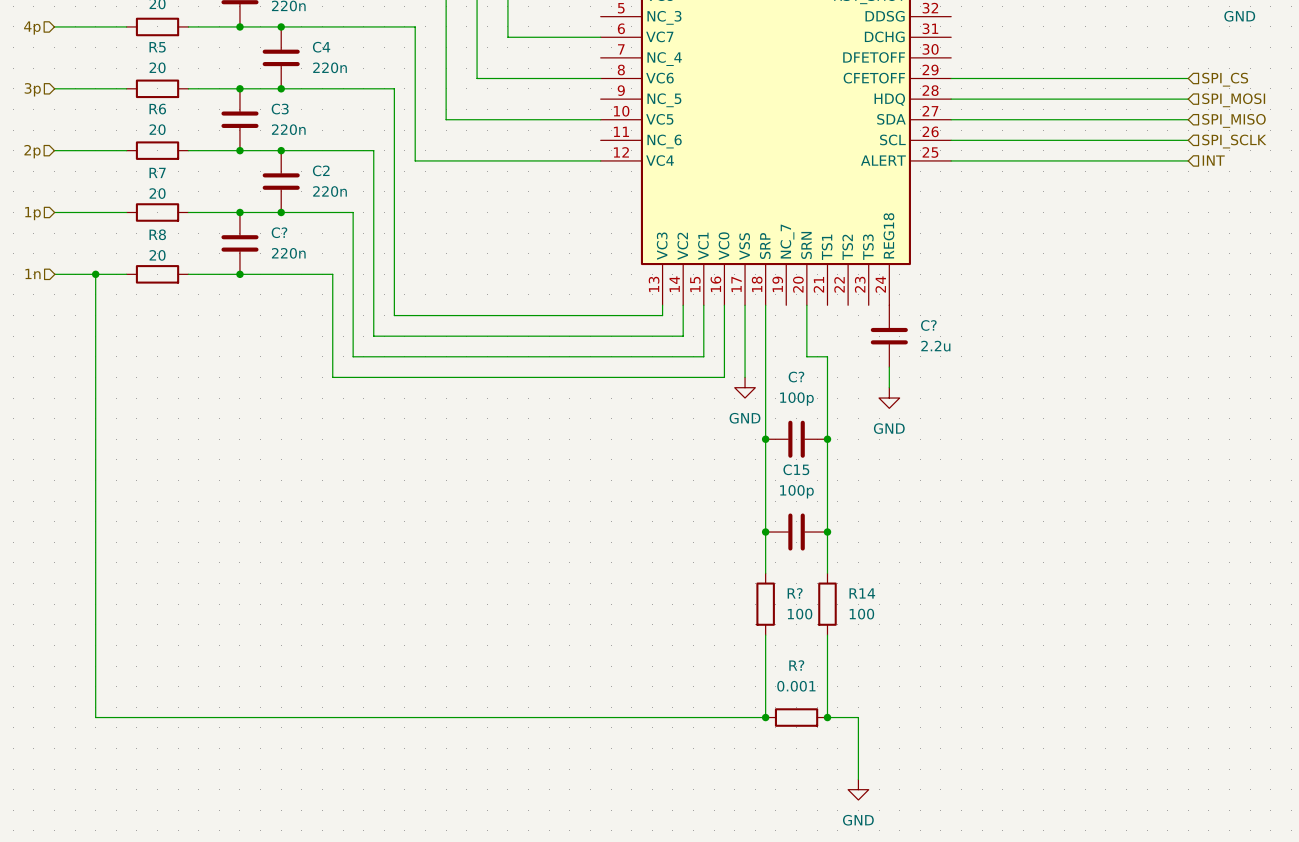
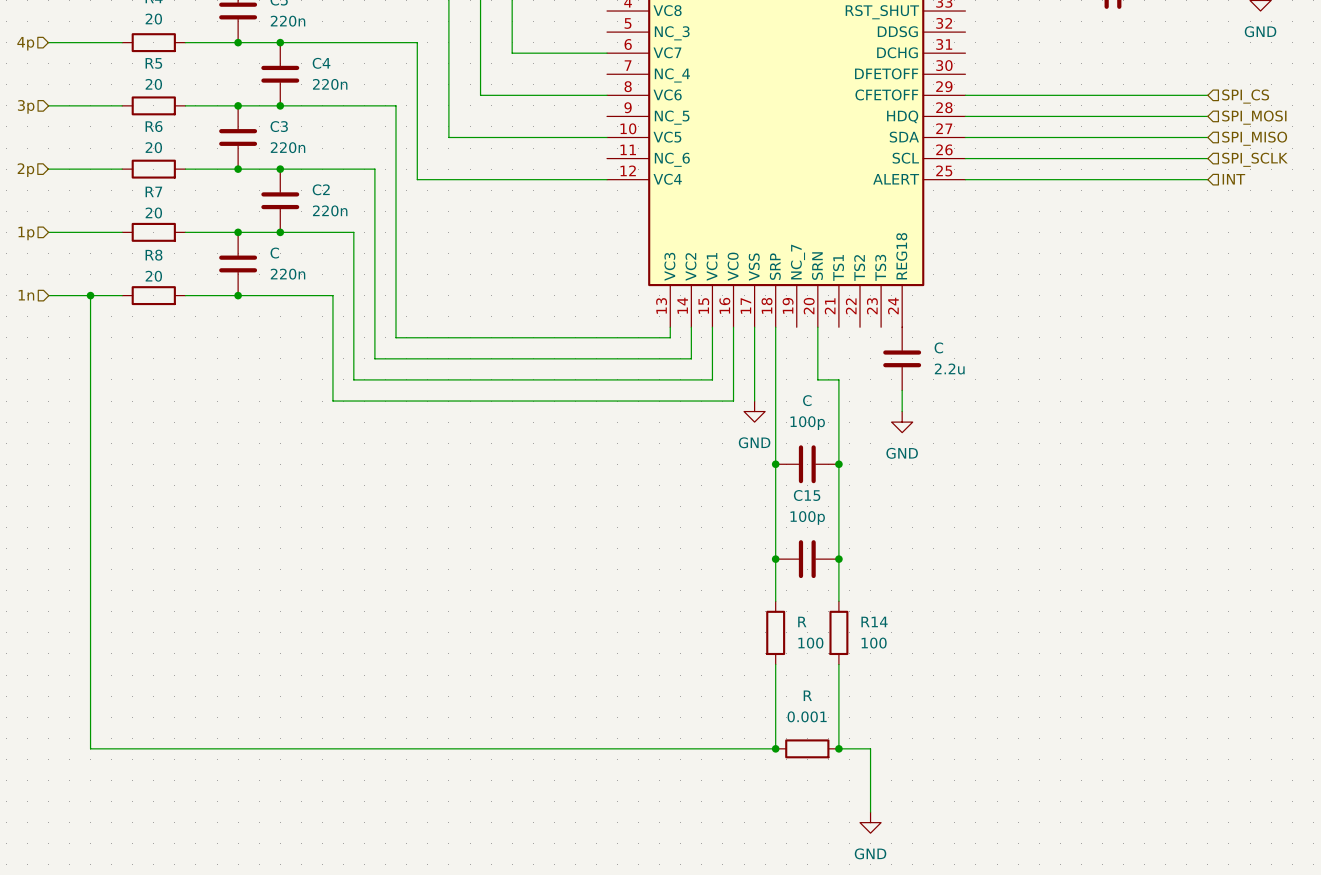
C? name: C? (279, 232) -> C (274, 253)
C? name: C? (928, 325) -> C (938, 347)
C? name: C? (796, 377) -> C (807, 400)
R? name: R? (795, 593) -> R (802, 621)
R? name: R? (796, 665) -> R (807, 695)

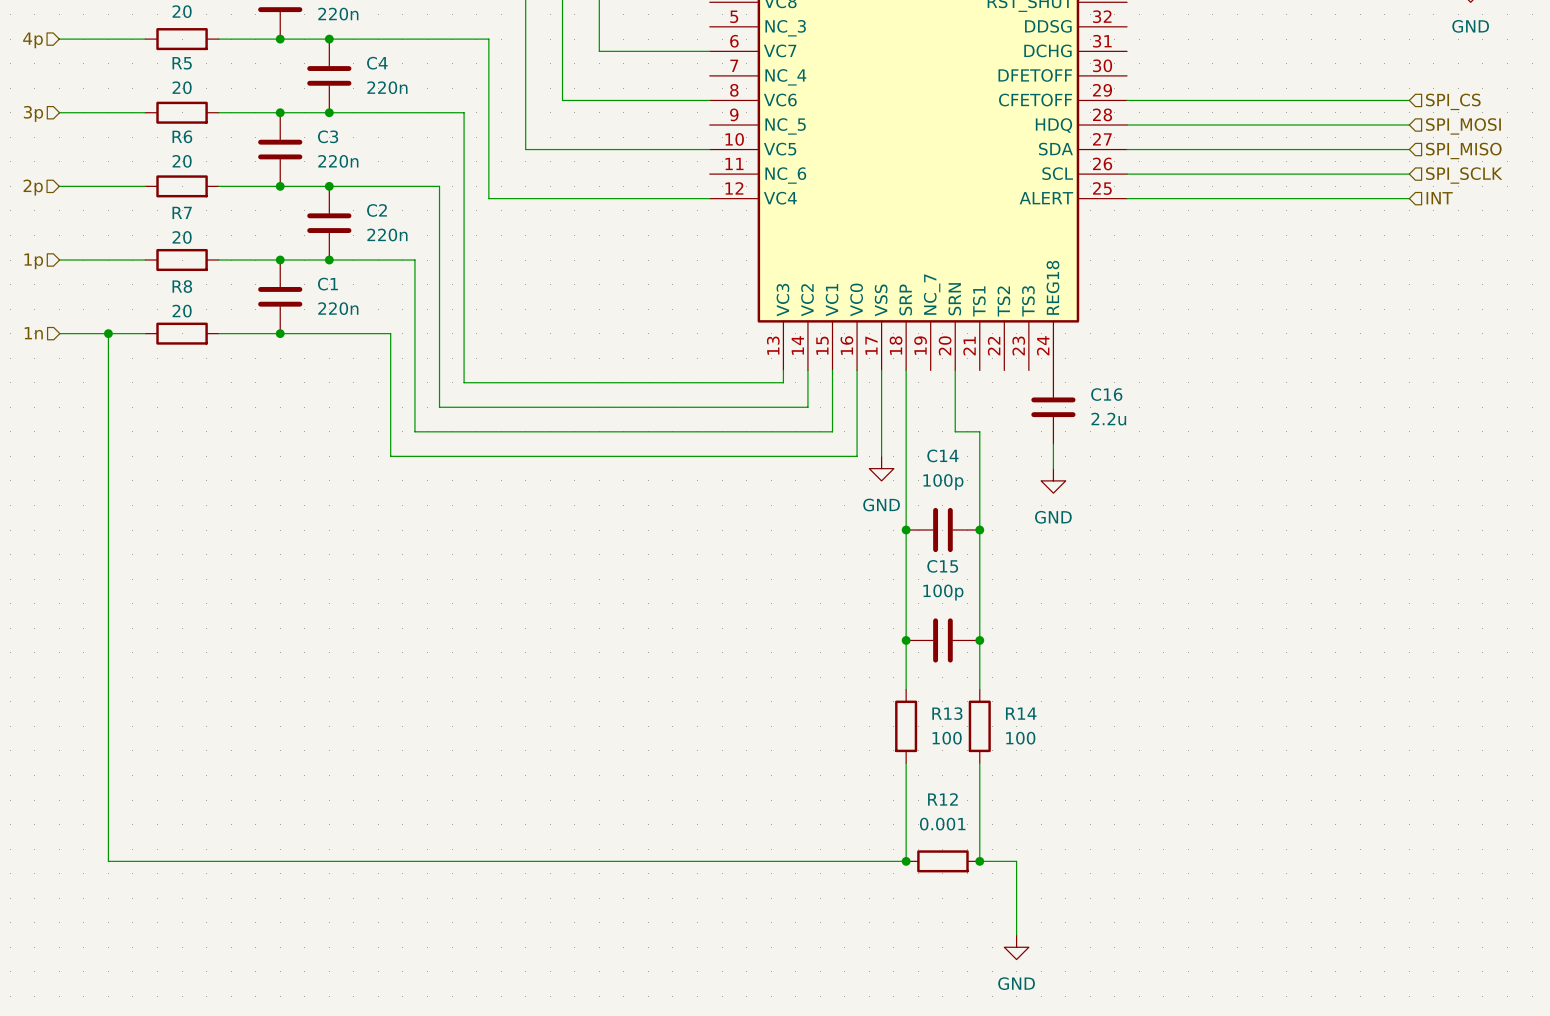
C name: C (274, 253) -> C1 (327, 284)
C name: C (938, 347) -> C16 (1106, 394)
C name: C (807, 400) -> C14 (942, 455)
R name: R (802, 621) -> R13 (947, 713)
R name: R (807, 695) -> R12 (942, 799)

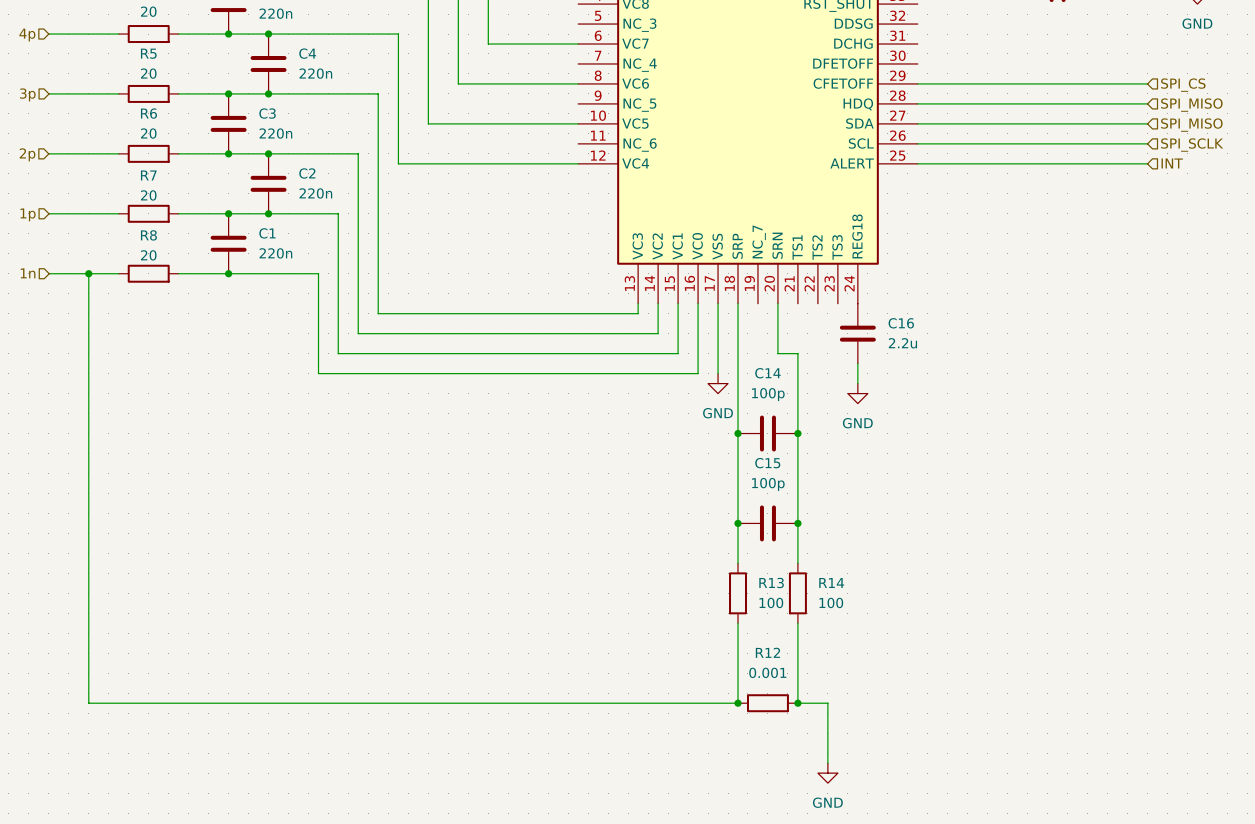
hierarchical label: SPI_MOSI (1463, 126) -> SPI_MISO (1191, 105)

